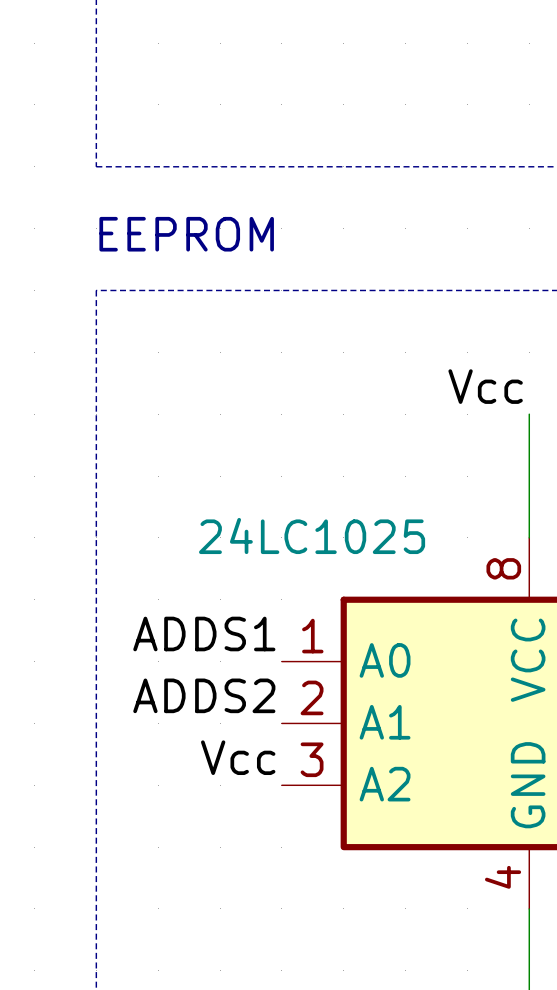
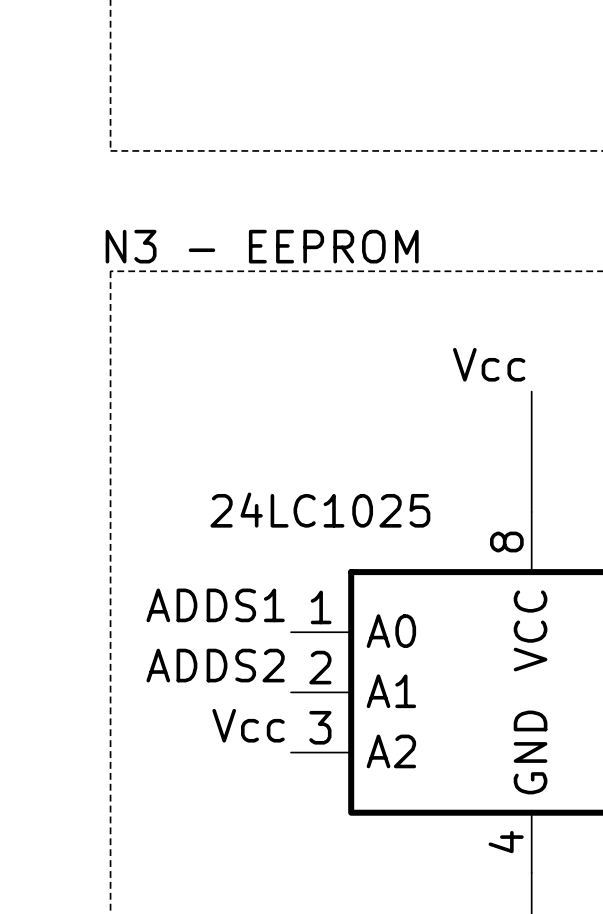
text: EEPROM (186, 234) -> N3 - EEPROM (262, 246)

